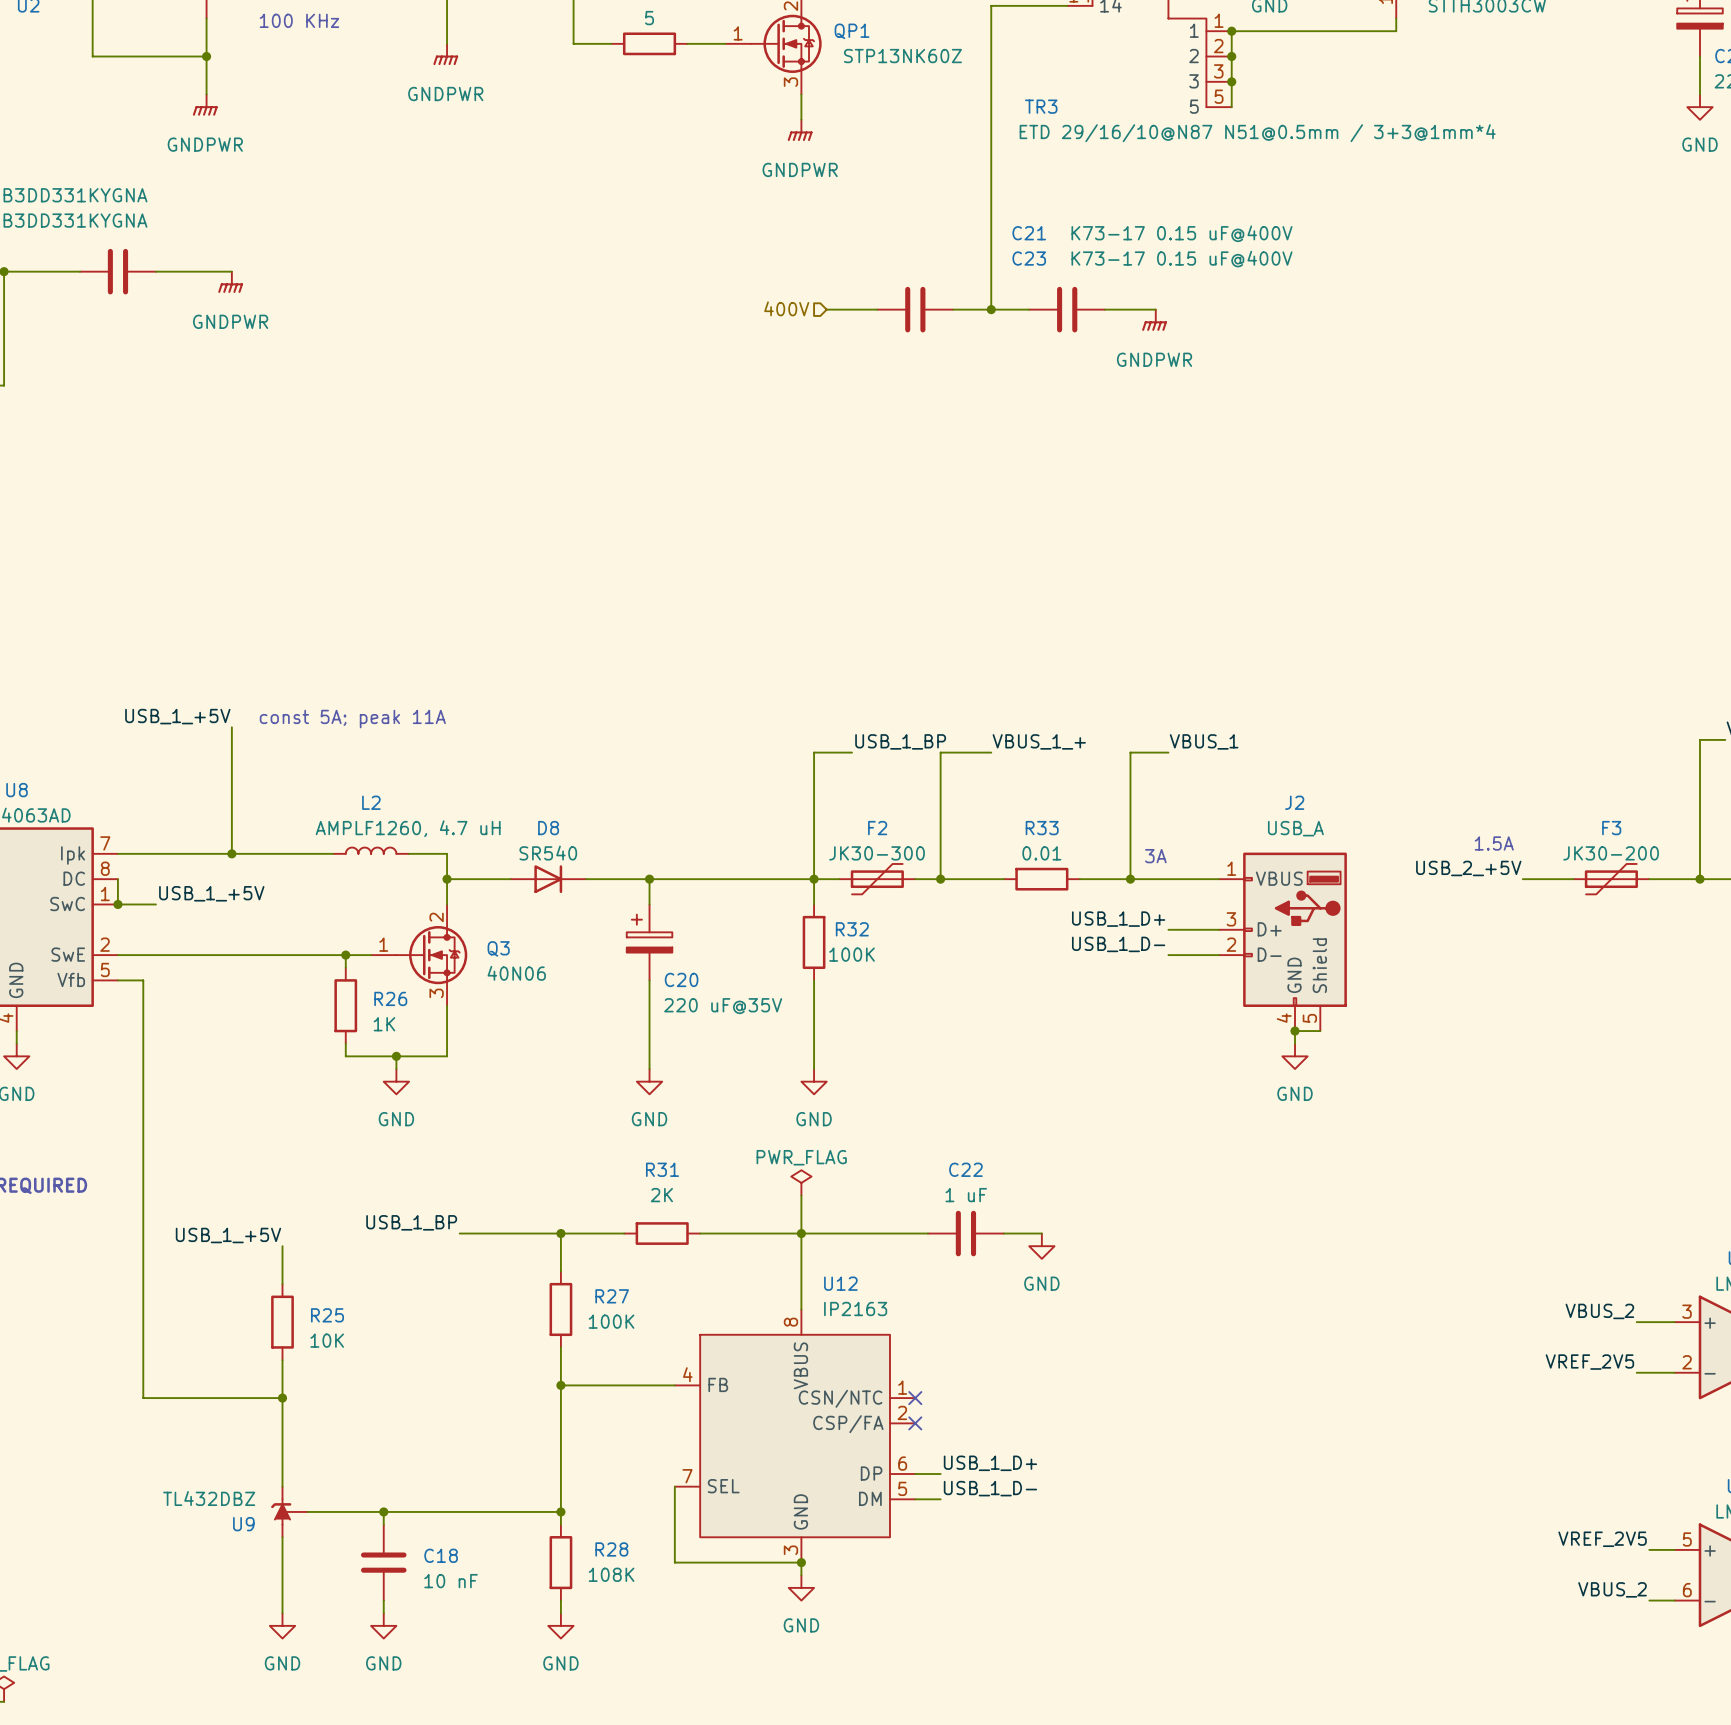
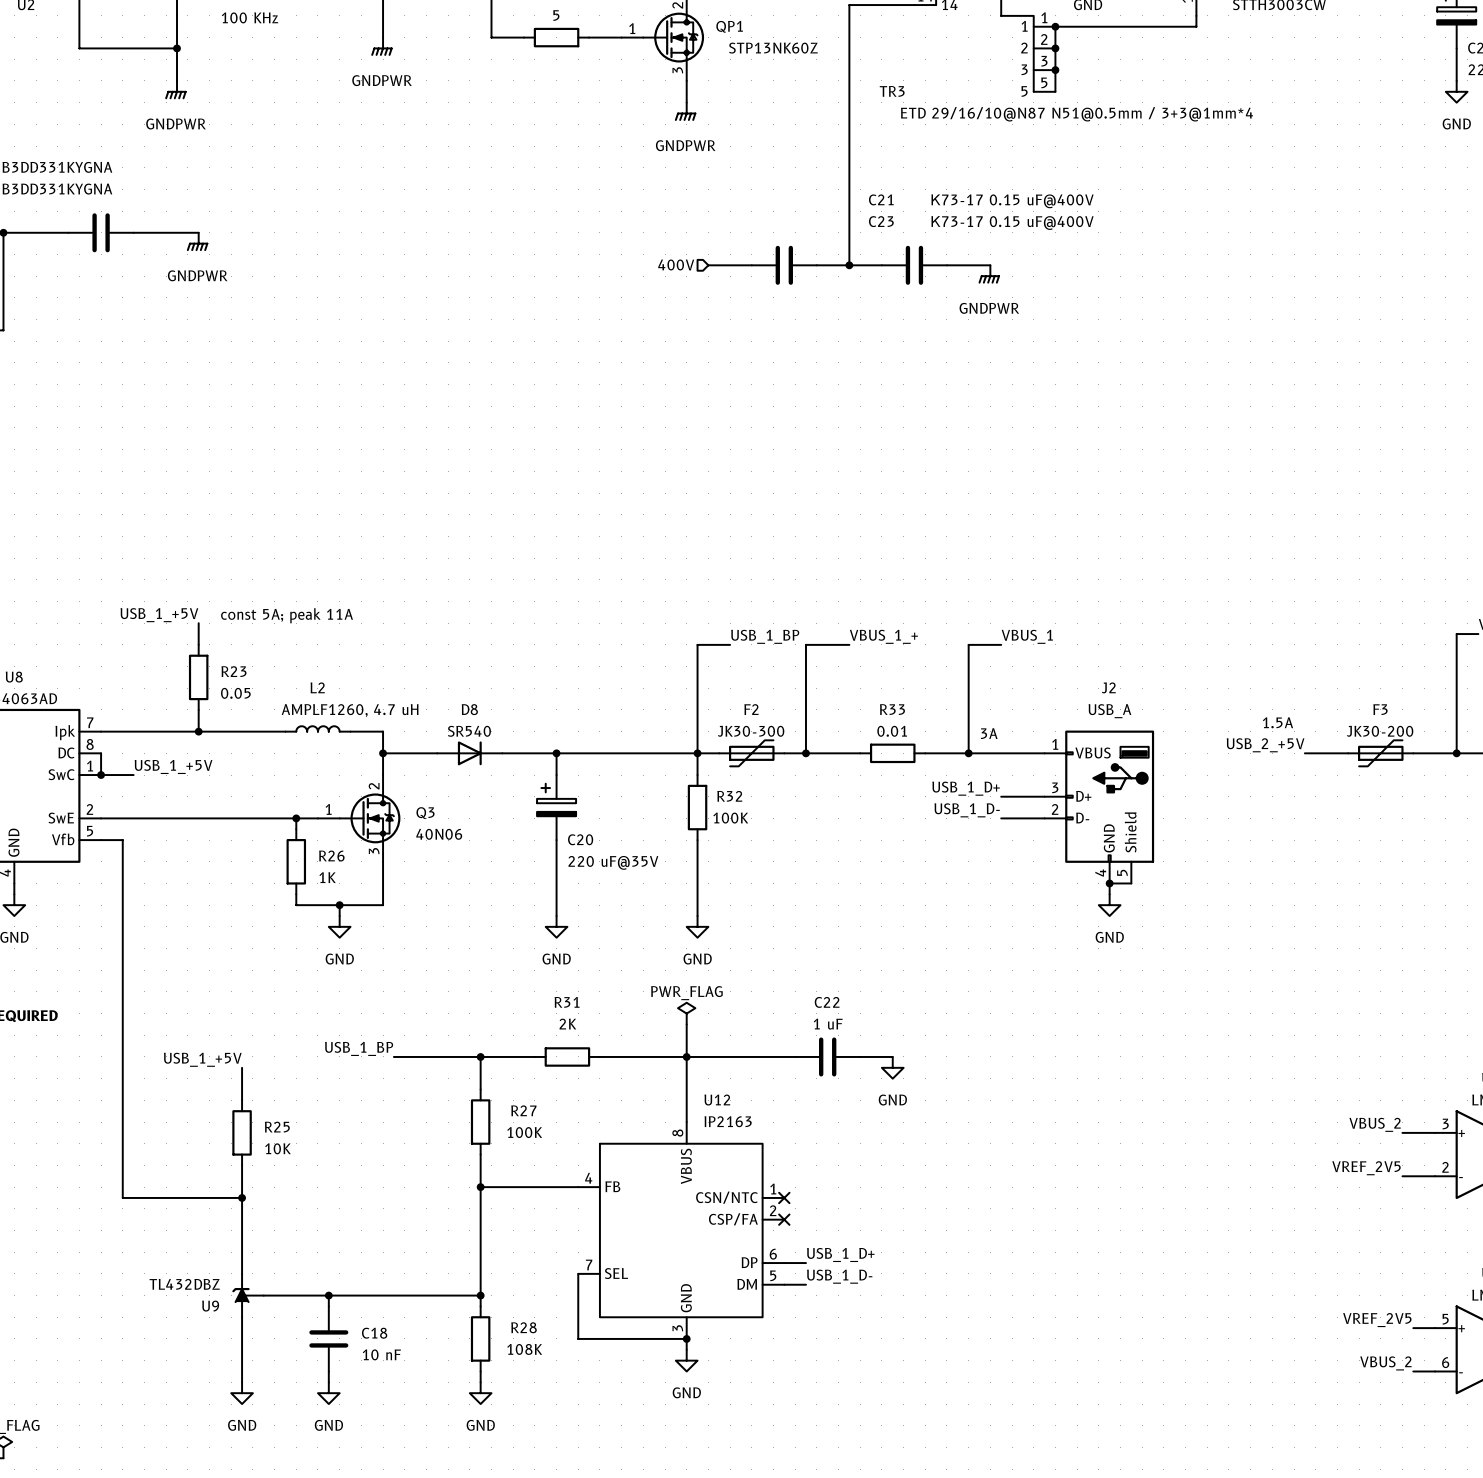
wire: (231, 752) (231, 828) -> none
R23: none -> 0.05 (198, 677)

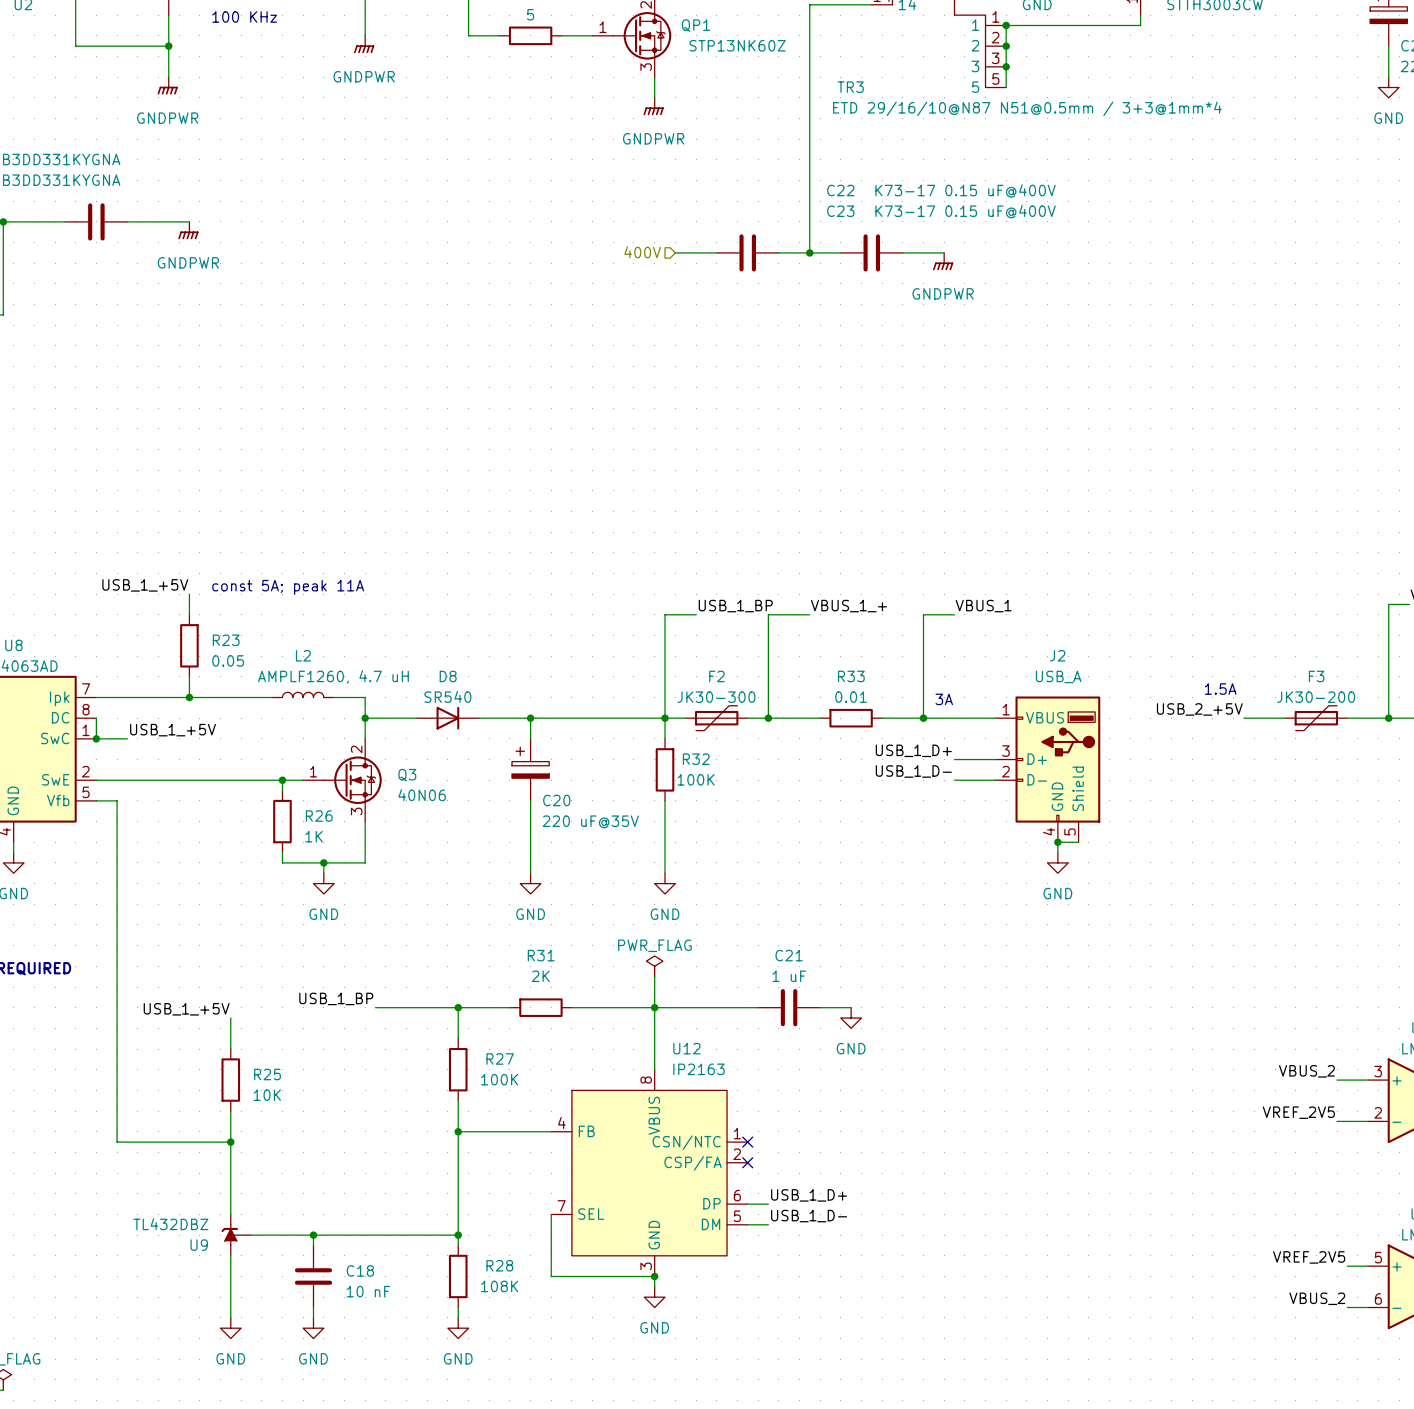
C21 name: C21 (881, 199) -> C22 (840, 190)
C22 name: C22 (827, 1002) -> C21 (789, 955)

